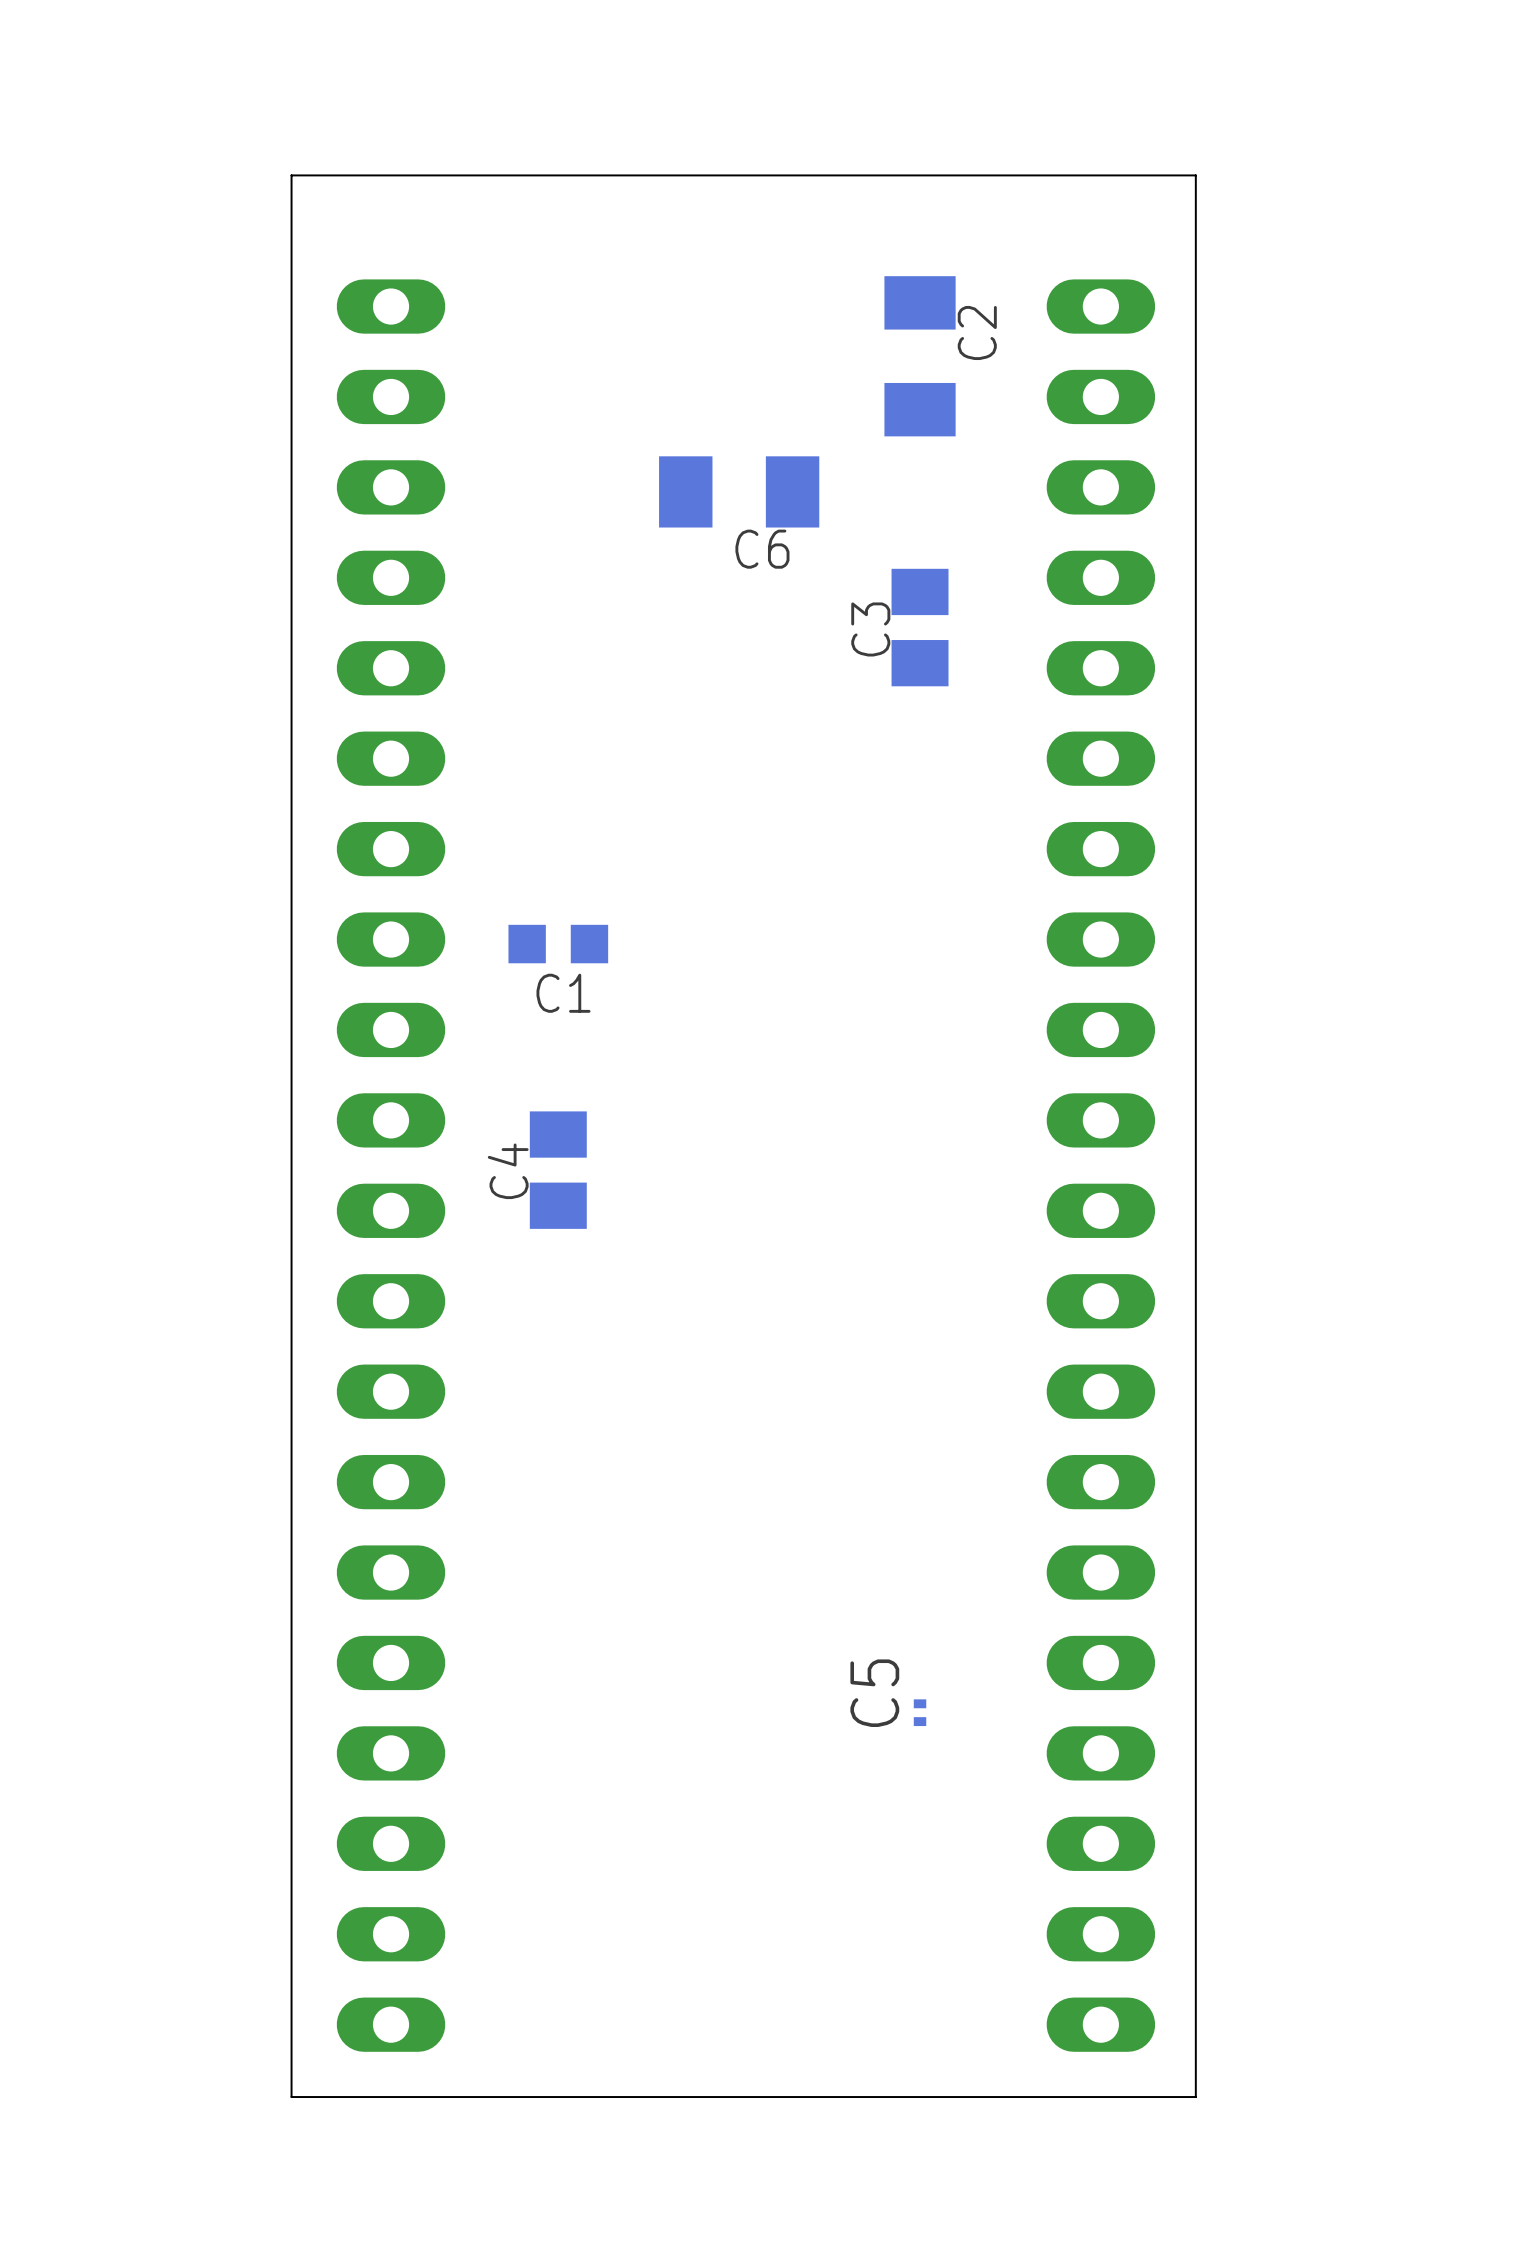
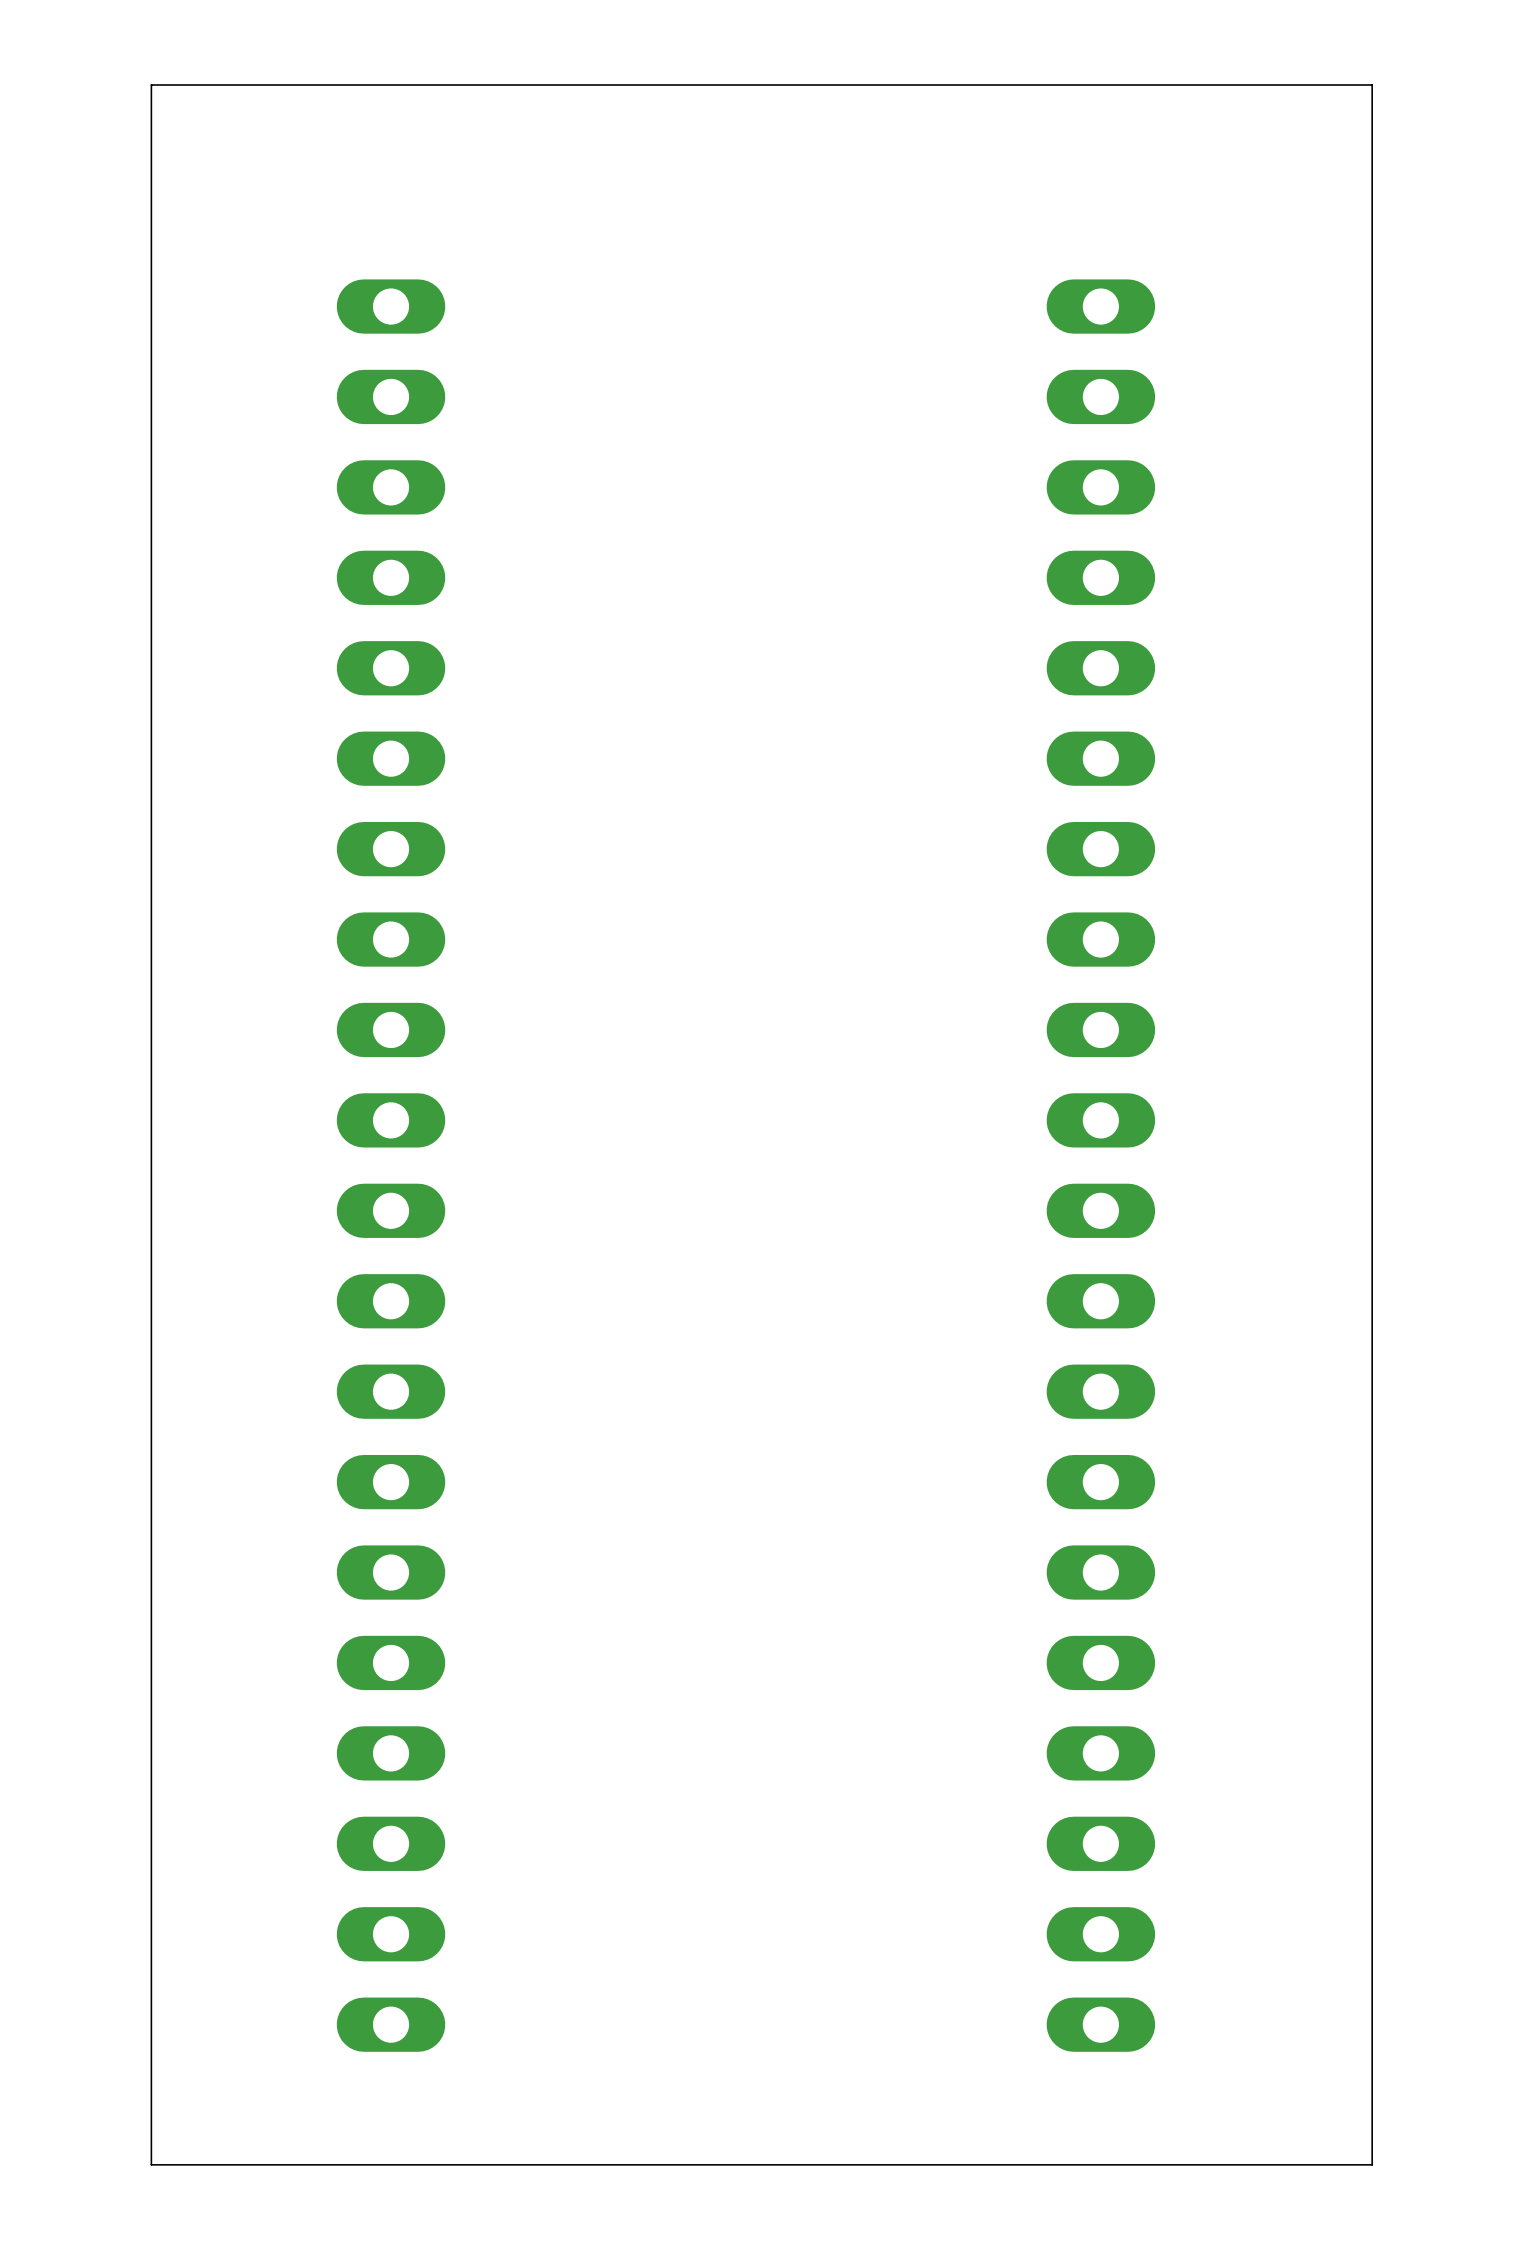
board edge: (1195, 175) (291, 175) (291, 2097) (1195, 2097) (1195, 175) -> (1372, 84) (1372, 2164) (151, 2164) (151, 84) (1372, 84)
C2: (920, 356) -> none
C6: (739, 491) -> none
C3: (920, 627) -> none
C1: (558, 944) -> none
C4: (558, 1170) -> none
C5: (920, 1712) -> none

